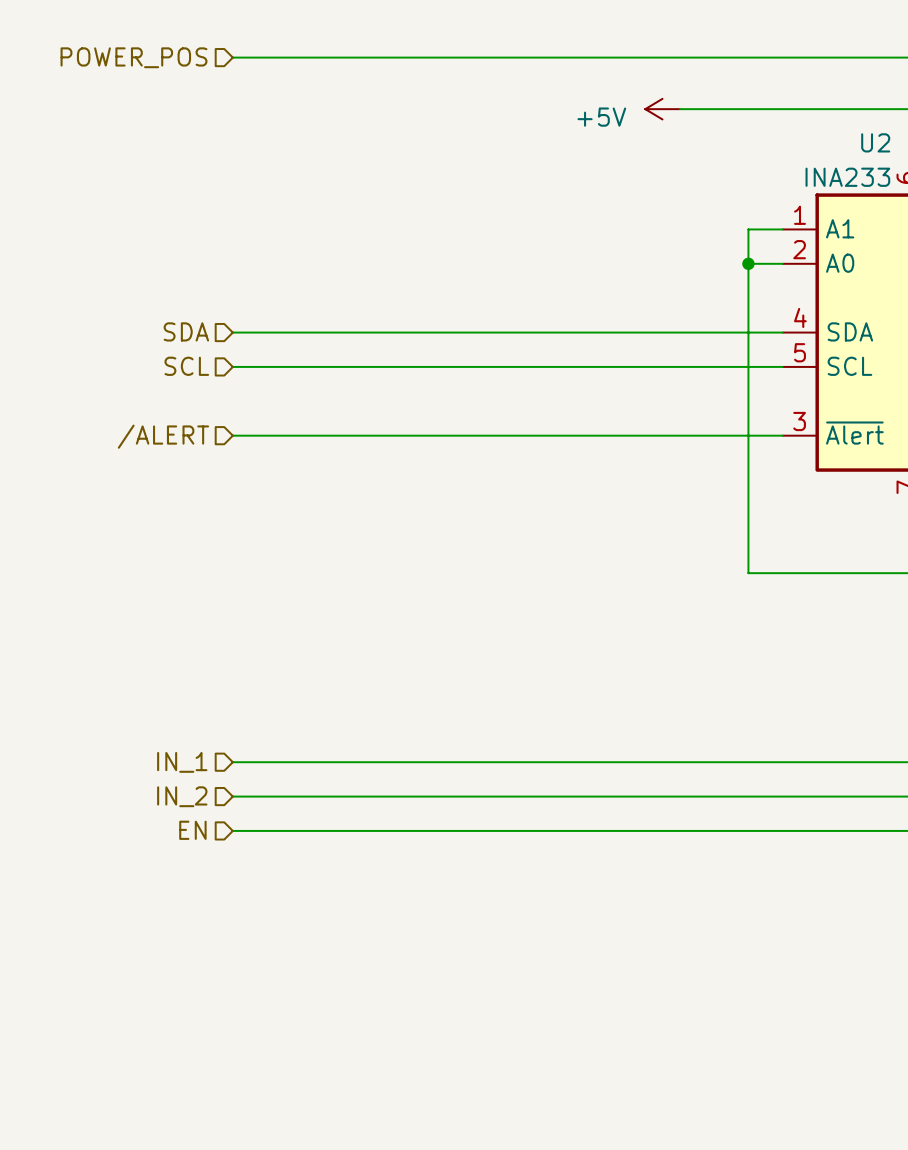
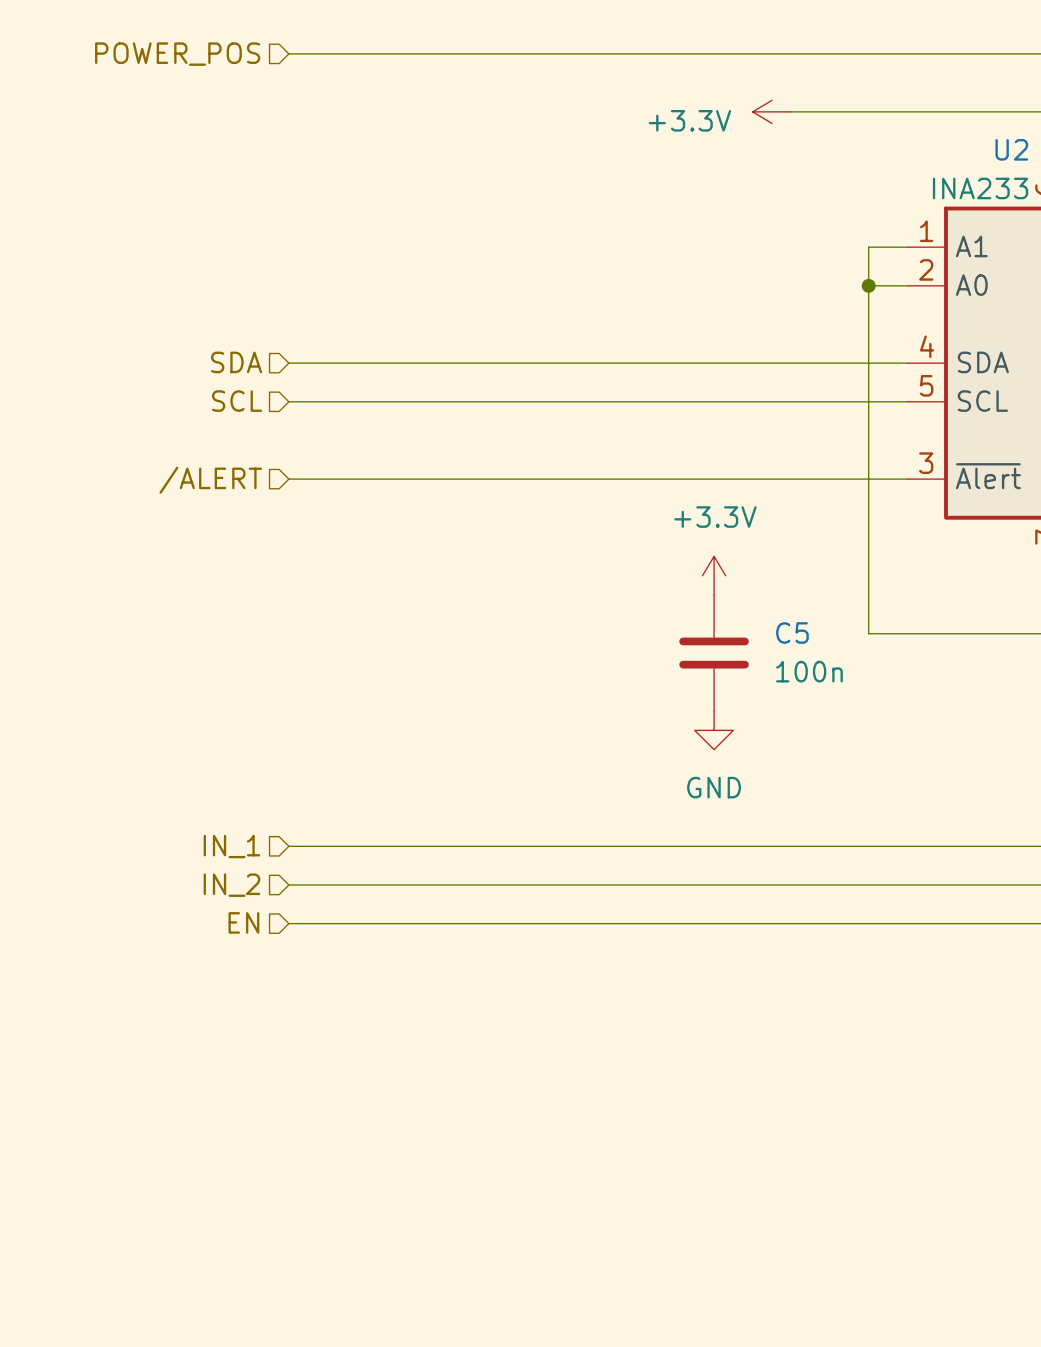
power symbol: +5V (662, 109) -> +3.3V (772, 111)
power symbol: none -> +3.3V (714, 575)
C5: none -> 100n (714, 653)
power symbol: none -> GND (714, 730)

